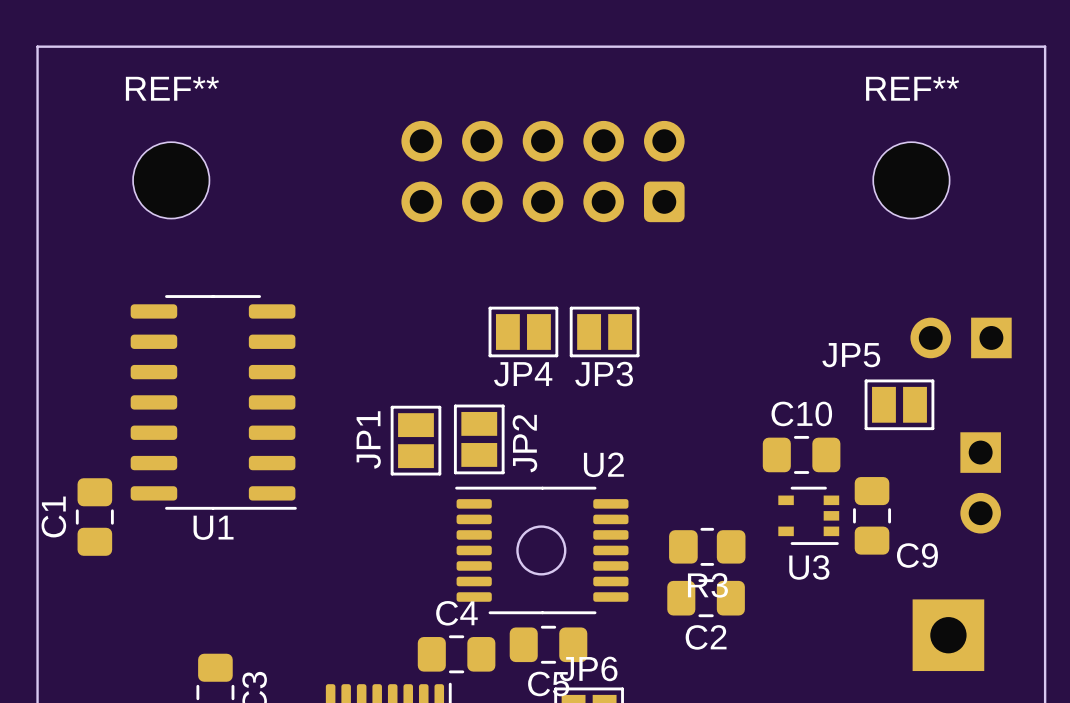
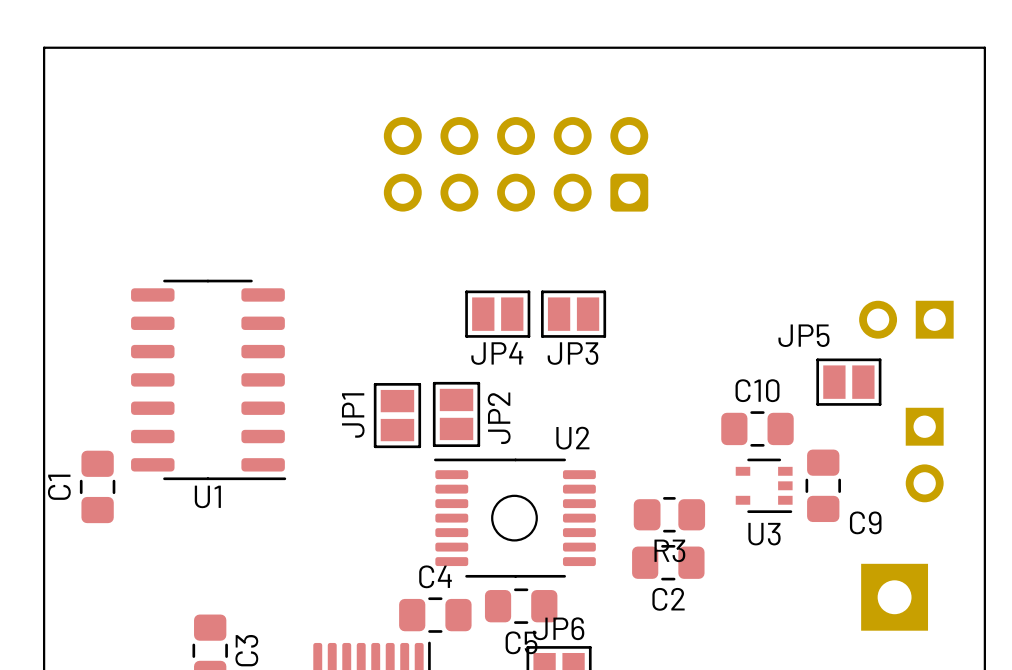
REF**: (171, 180) -> none
REF**: (911, 180) -> none

